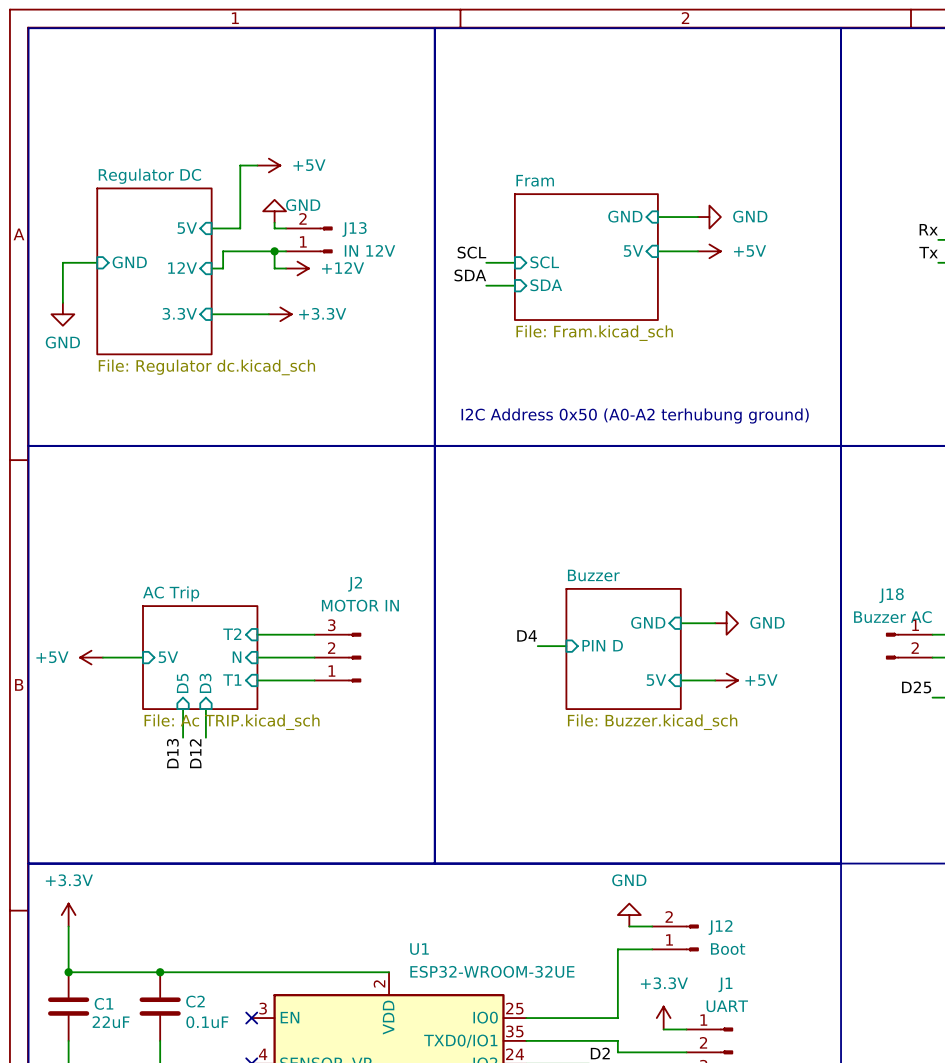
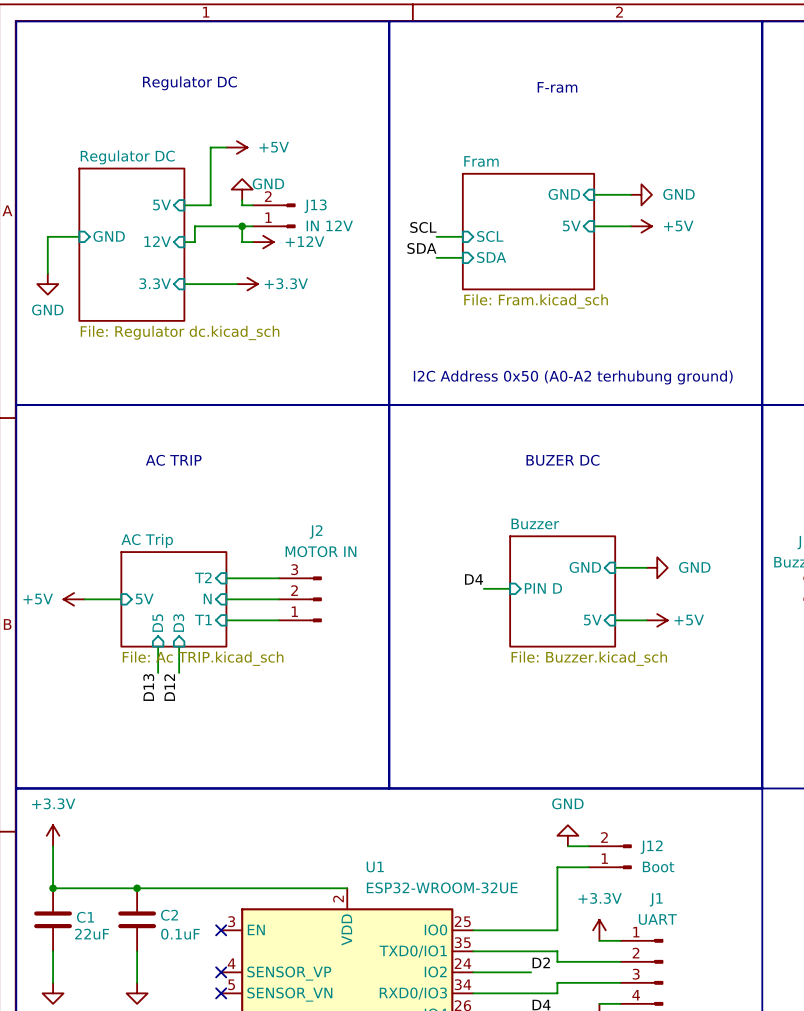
text: none -> Regulator DC (189, 83)
text: none -> F-ram (557, 87)
text: none -> AC TRIP (173, 460)
text: none -> BUZER DC (562, 460)

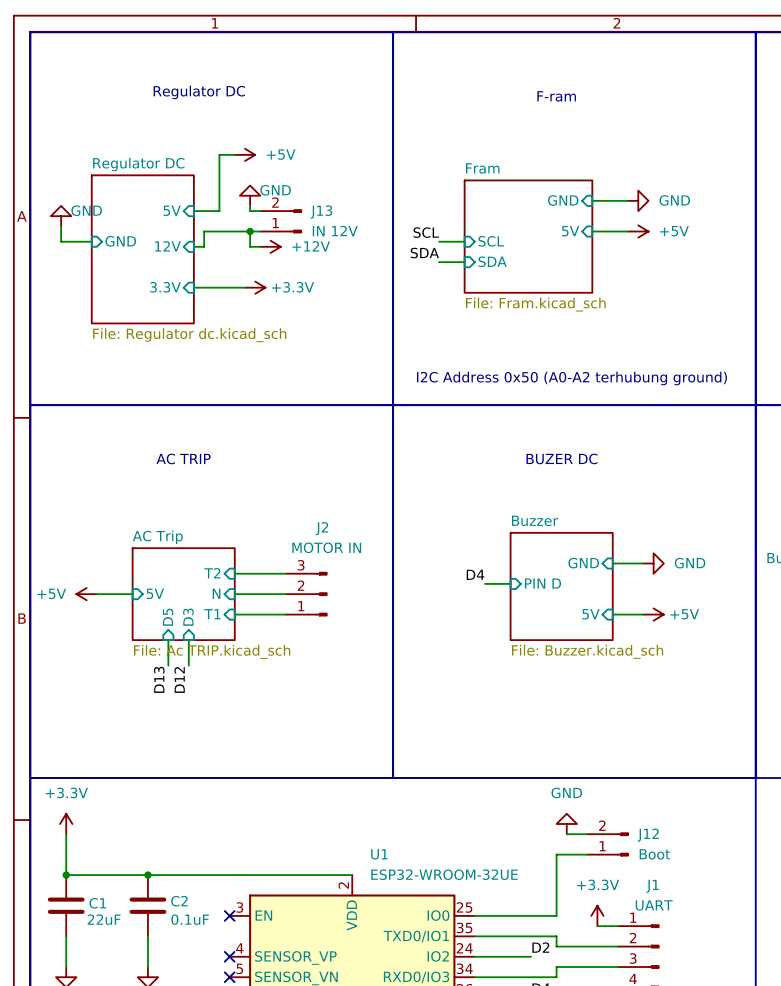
wire: (47, 236) (47, 273) -> (61, 241) (61, 226)
power symbol rotation: 0° (47, 284) -> 180° (61, 216)
power symbol position: GND (47, 284) -> GND (61, 216)
power symbol text position: GND (47, 310) -> GND (86, 210)

